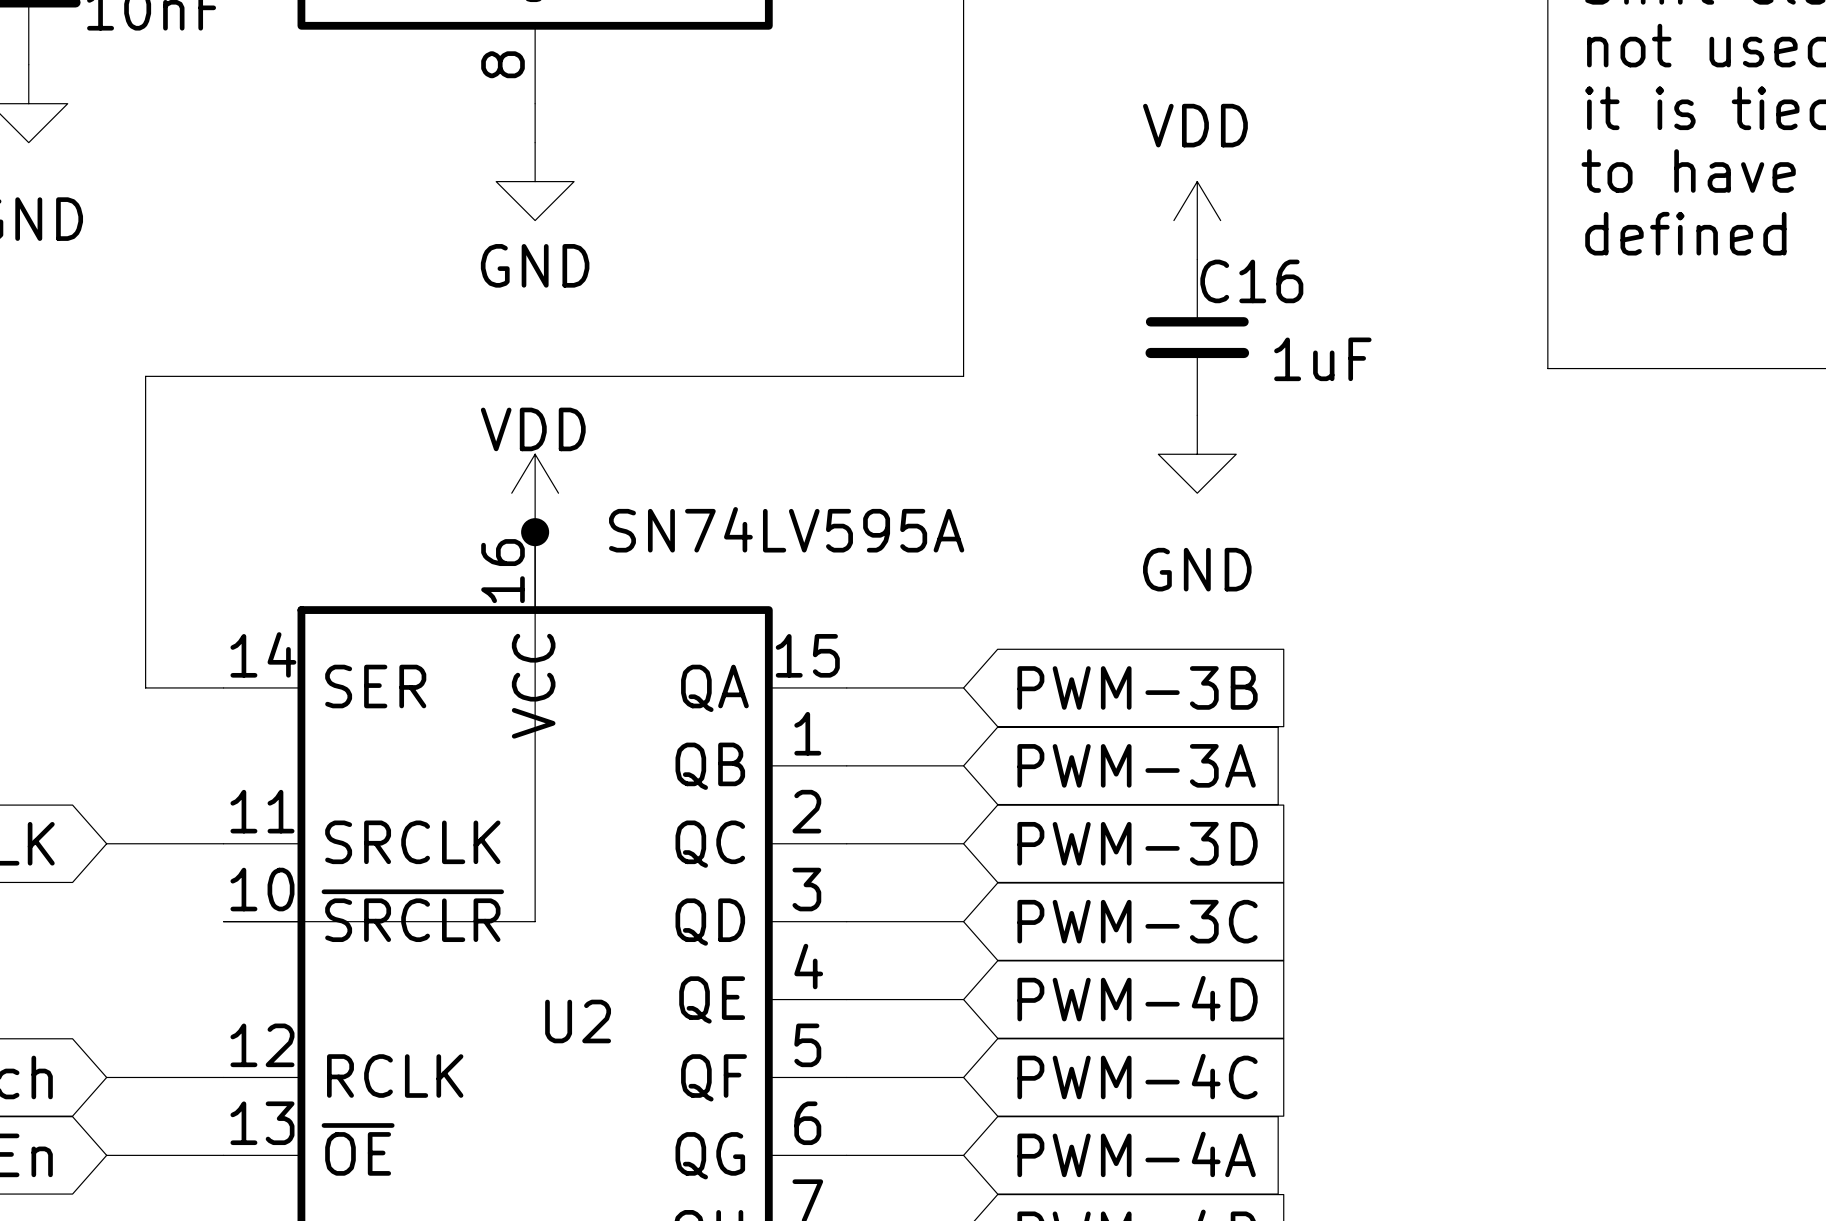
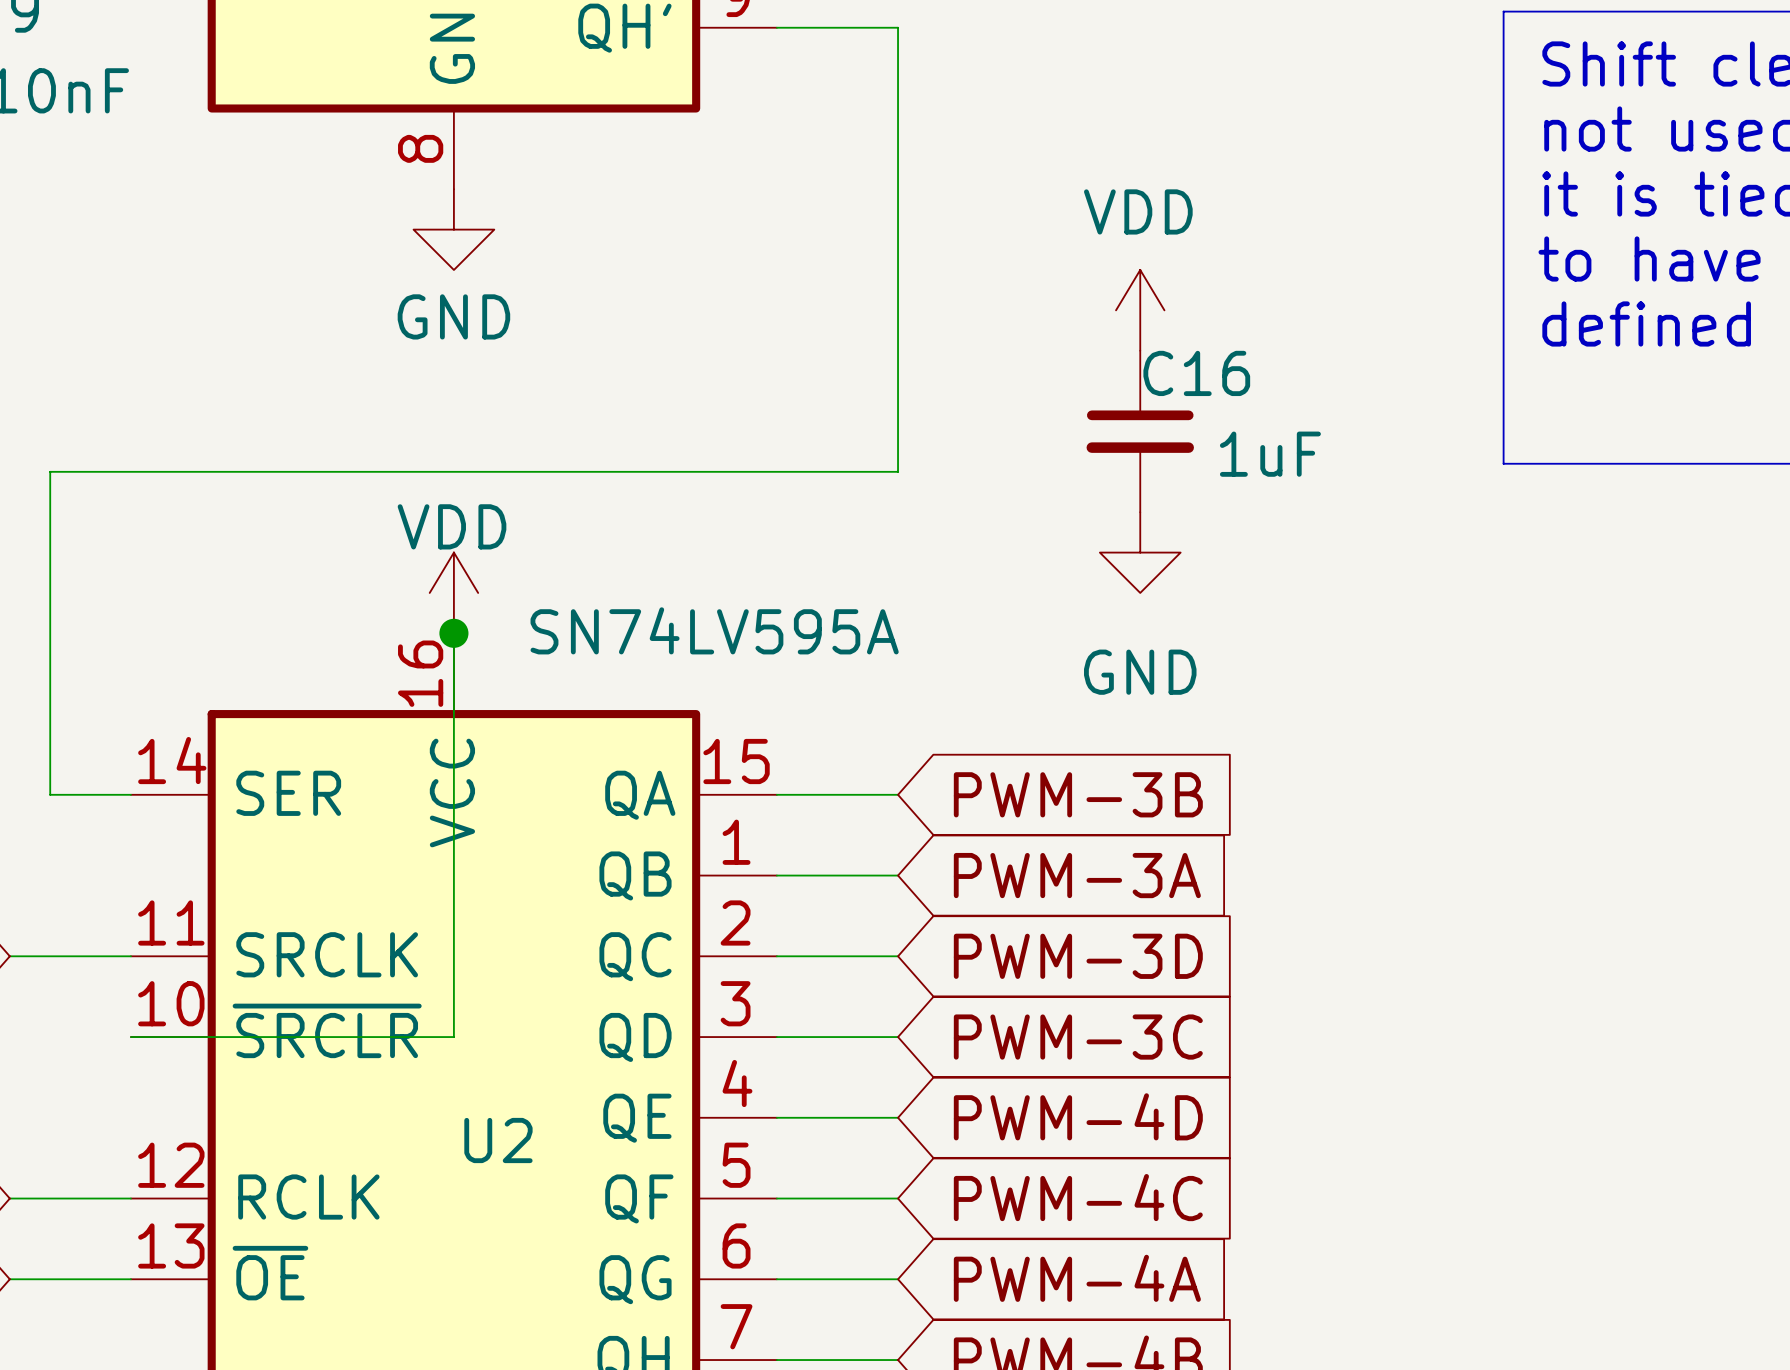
power symbol position: GND (535, 181) -> GND (453, 229)

